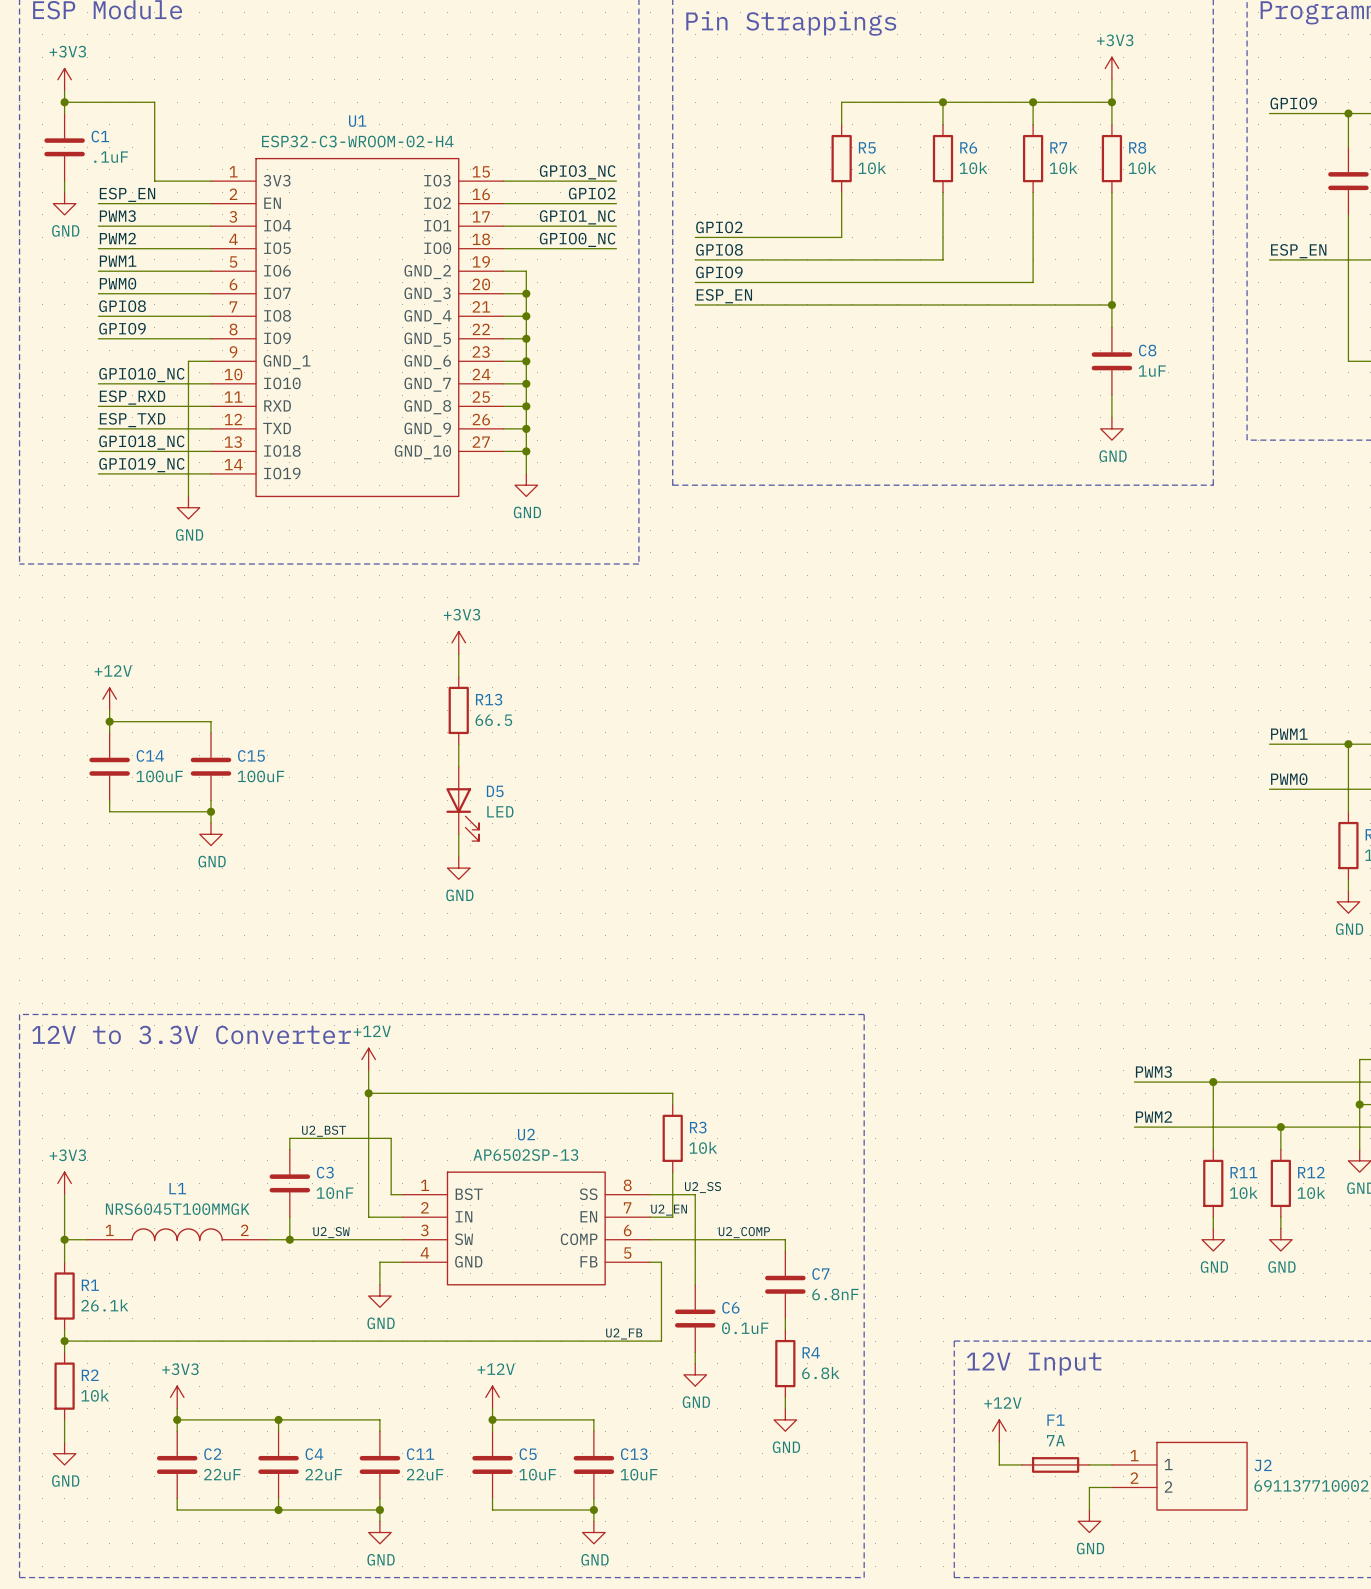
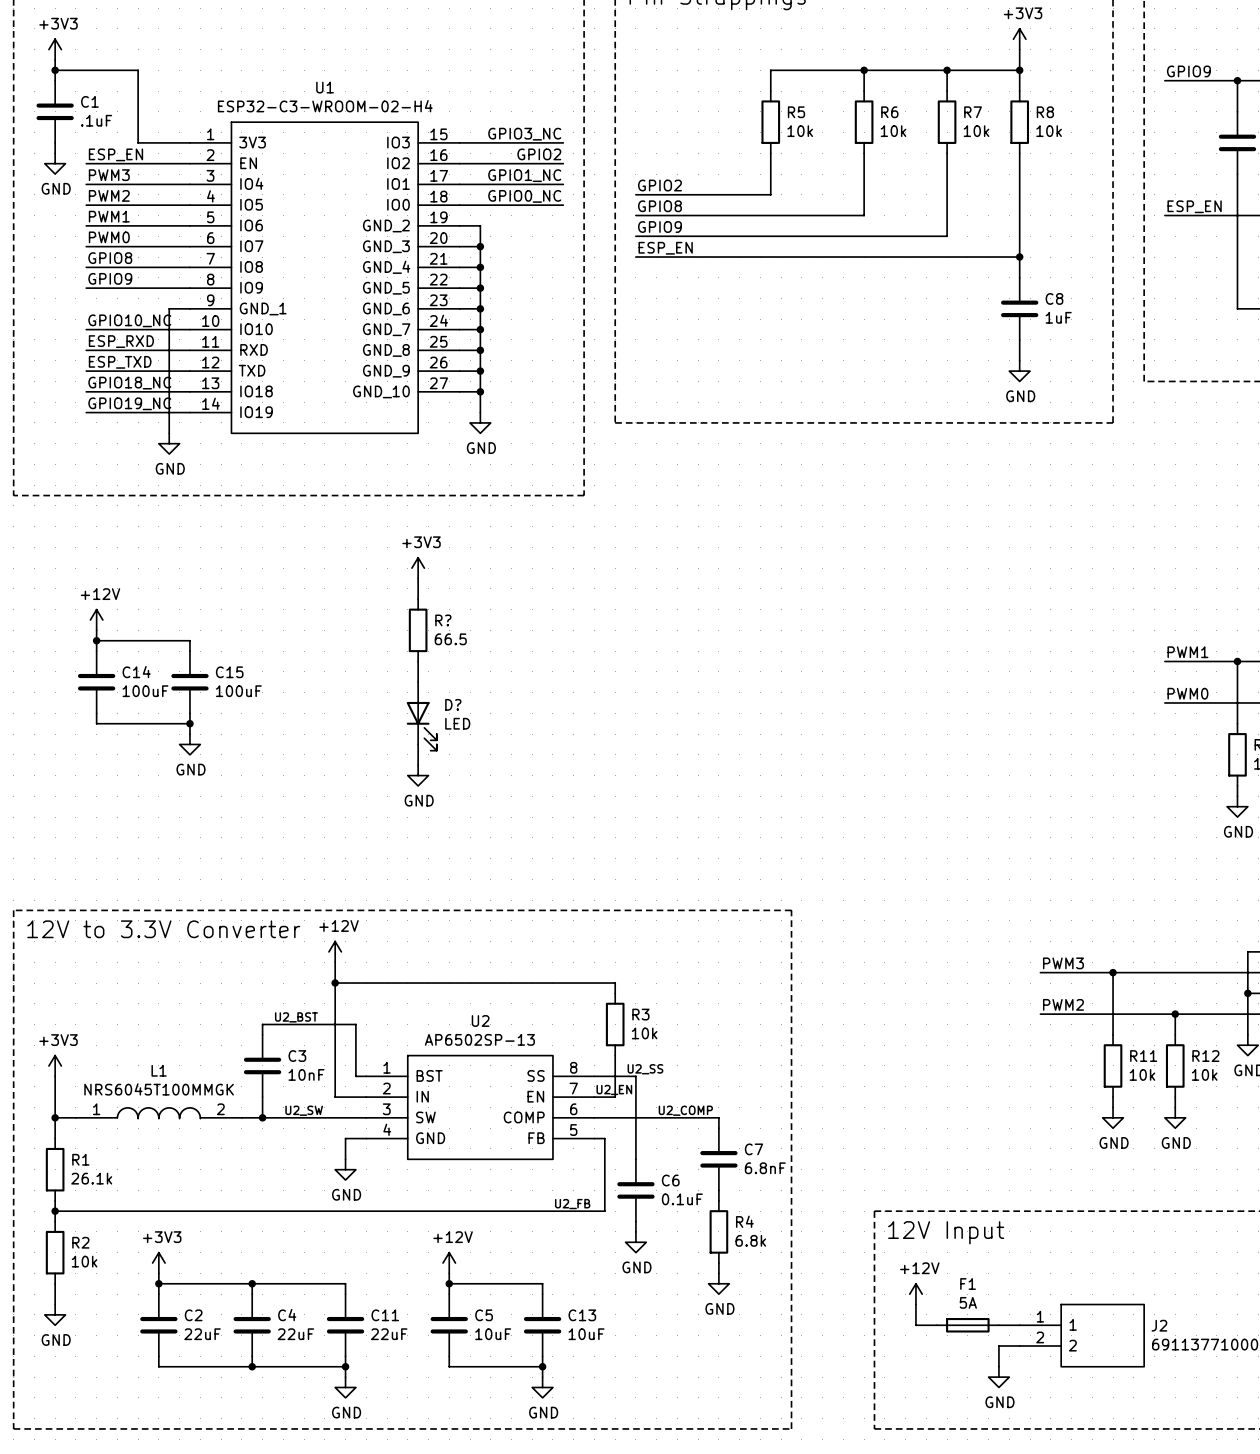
R13 name: R13 (489, 699) -> R? (443, 620)
D5 name: D5 (495, 791) -> D? (453, 704)
F1 value: 7A (1055, 1440) -> 5A (968, 1302)

